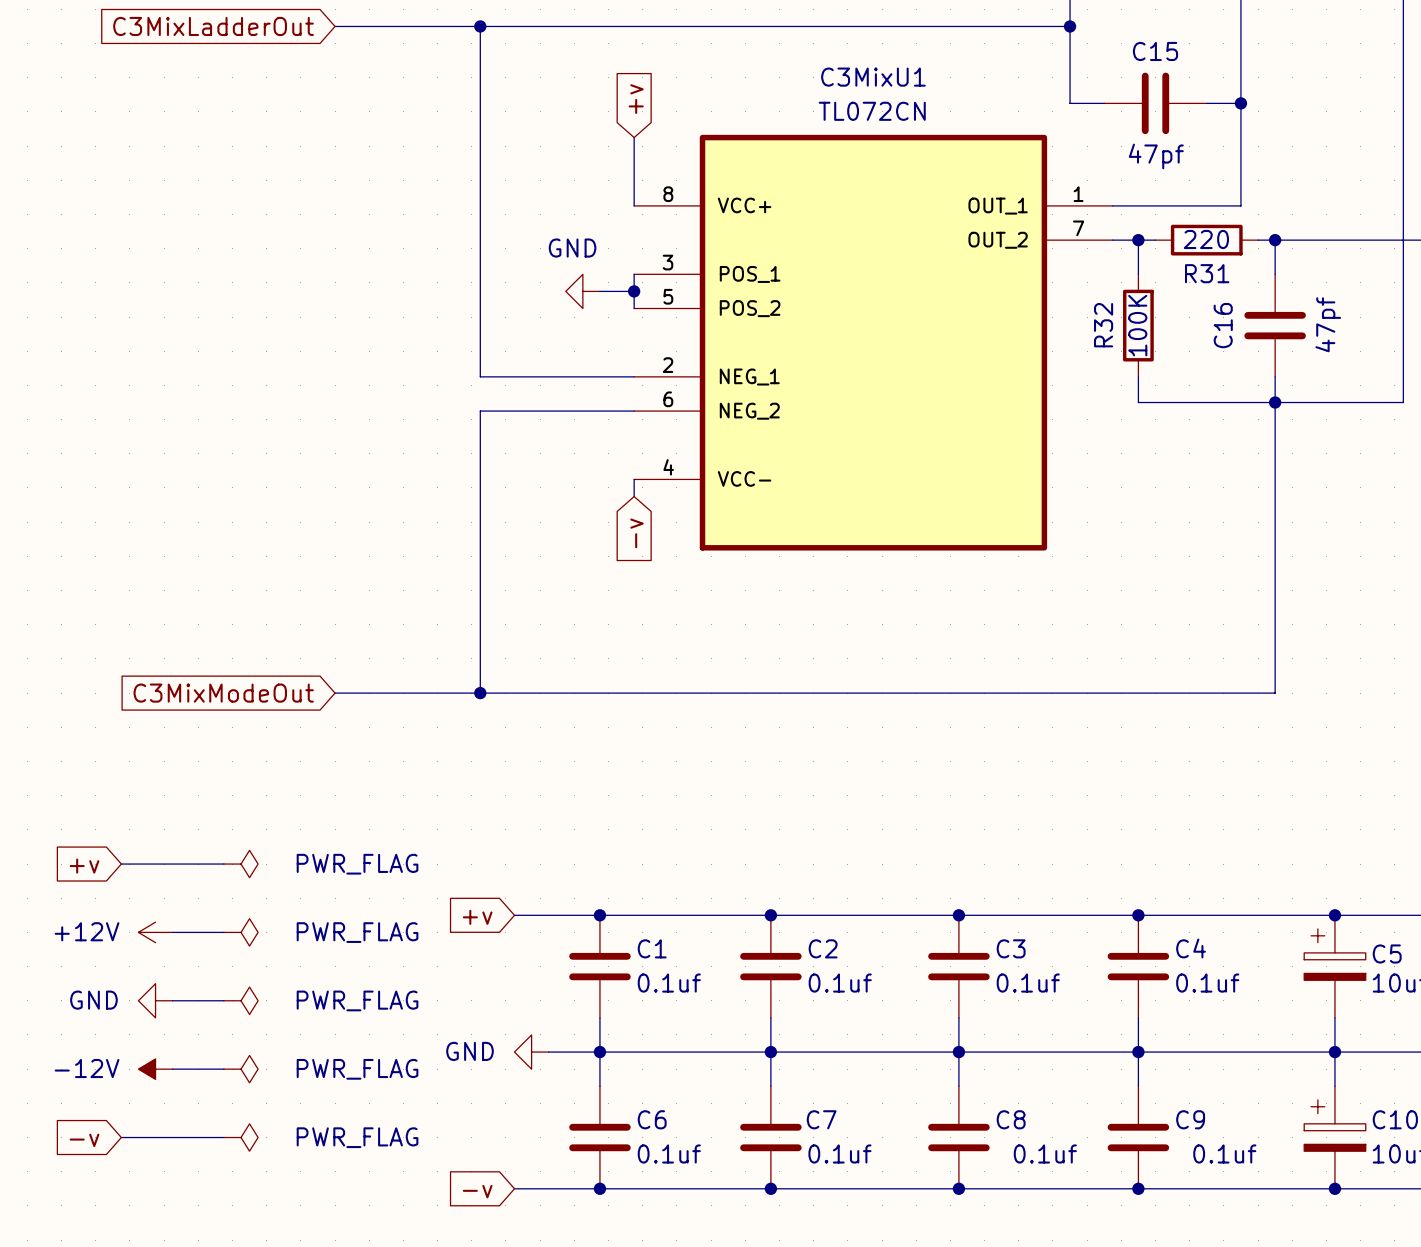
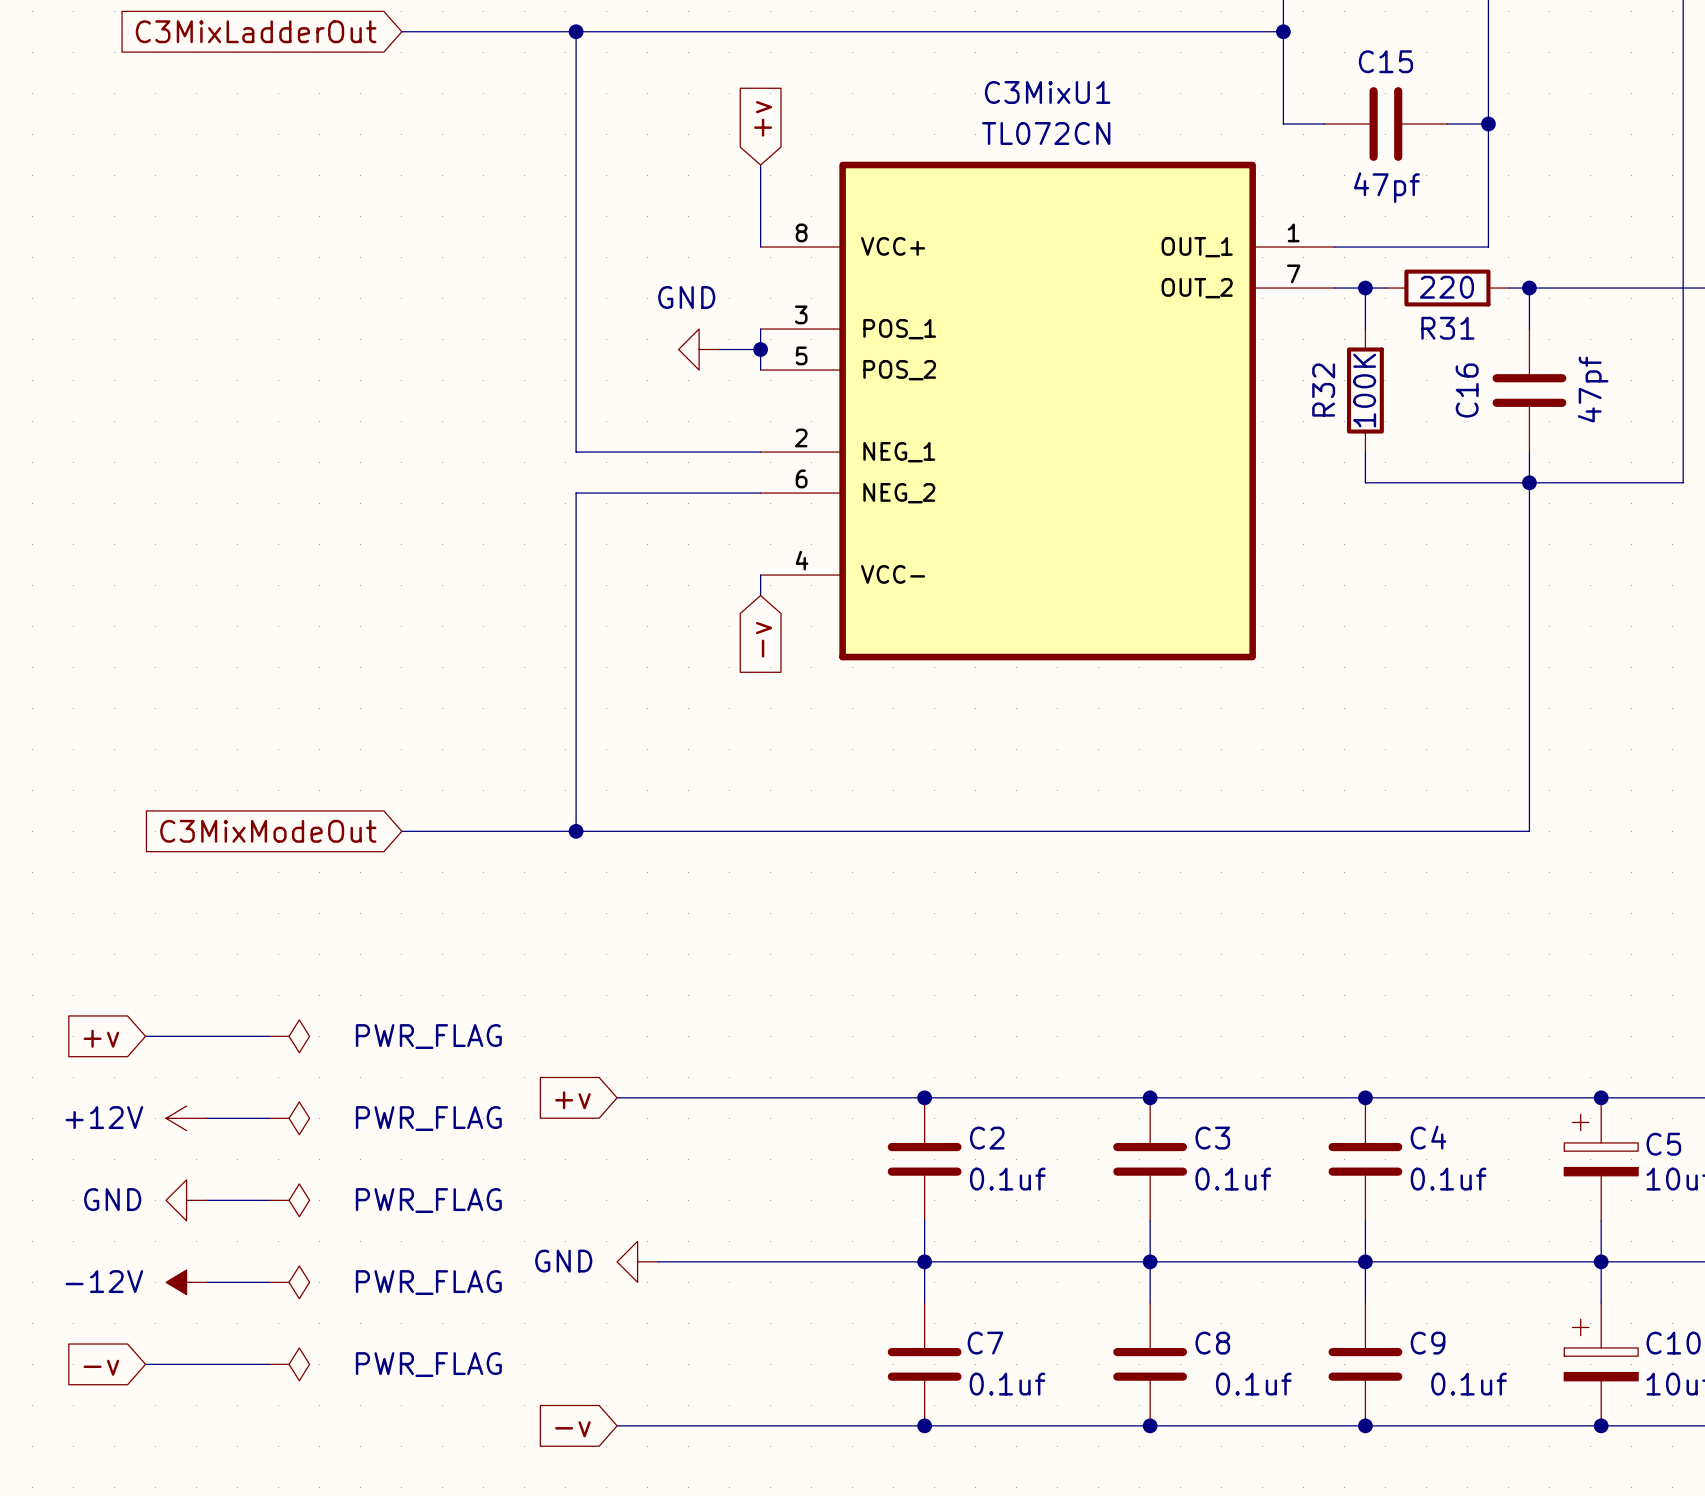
junction: (599, 915) -> none
C1: 0.1uf (599, 966) -> none
wire: (599, 1017) (599, 1086) -> none
junction: (599, 1052) -> none
C6: 0.1uf (599, 1137) -> none
junction: (599, 1188) -> none

